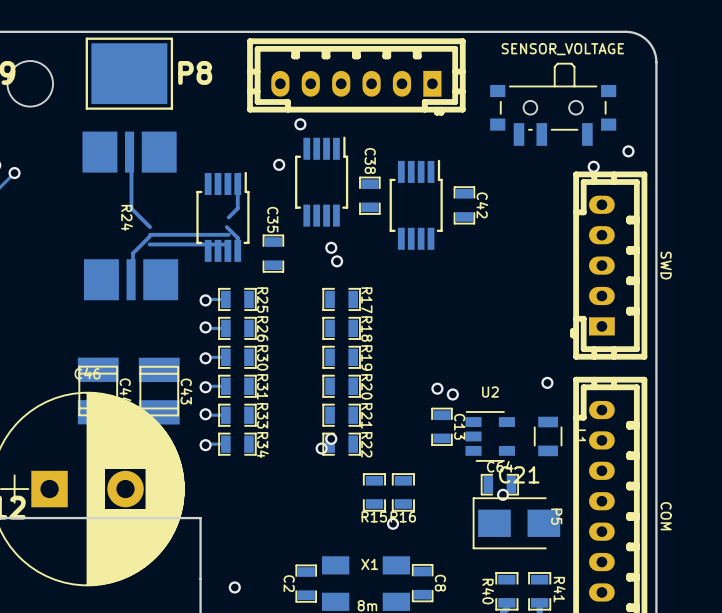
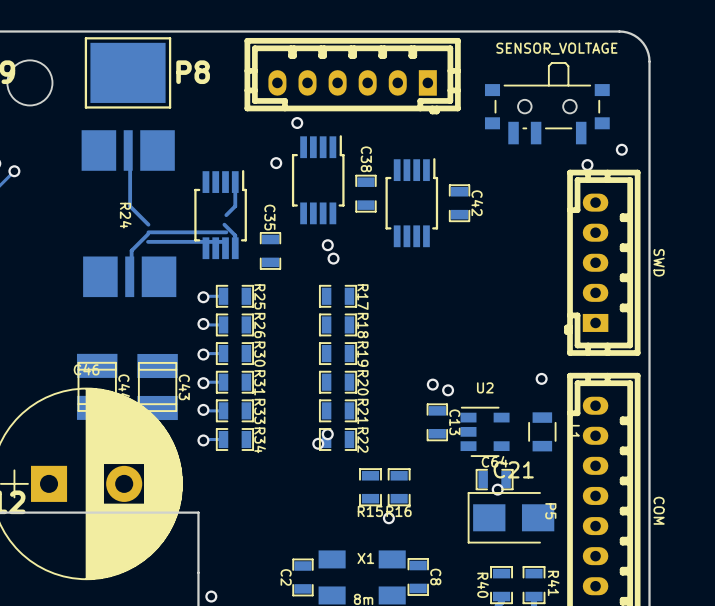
via: (234, 587) -> none
via: none -> (211, 596)

